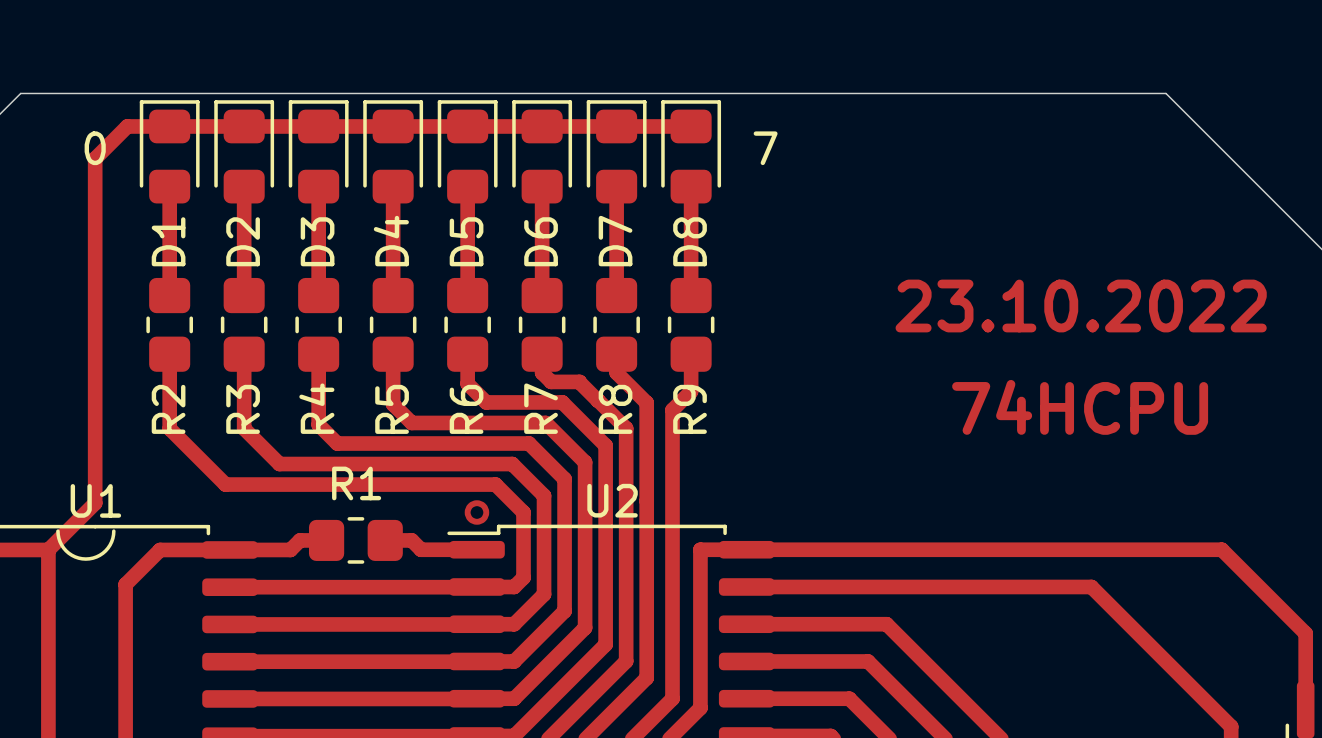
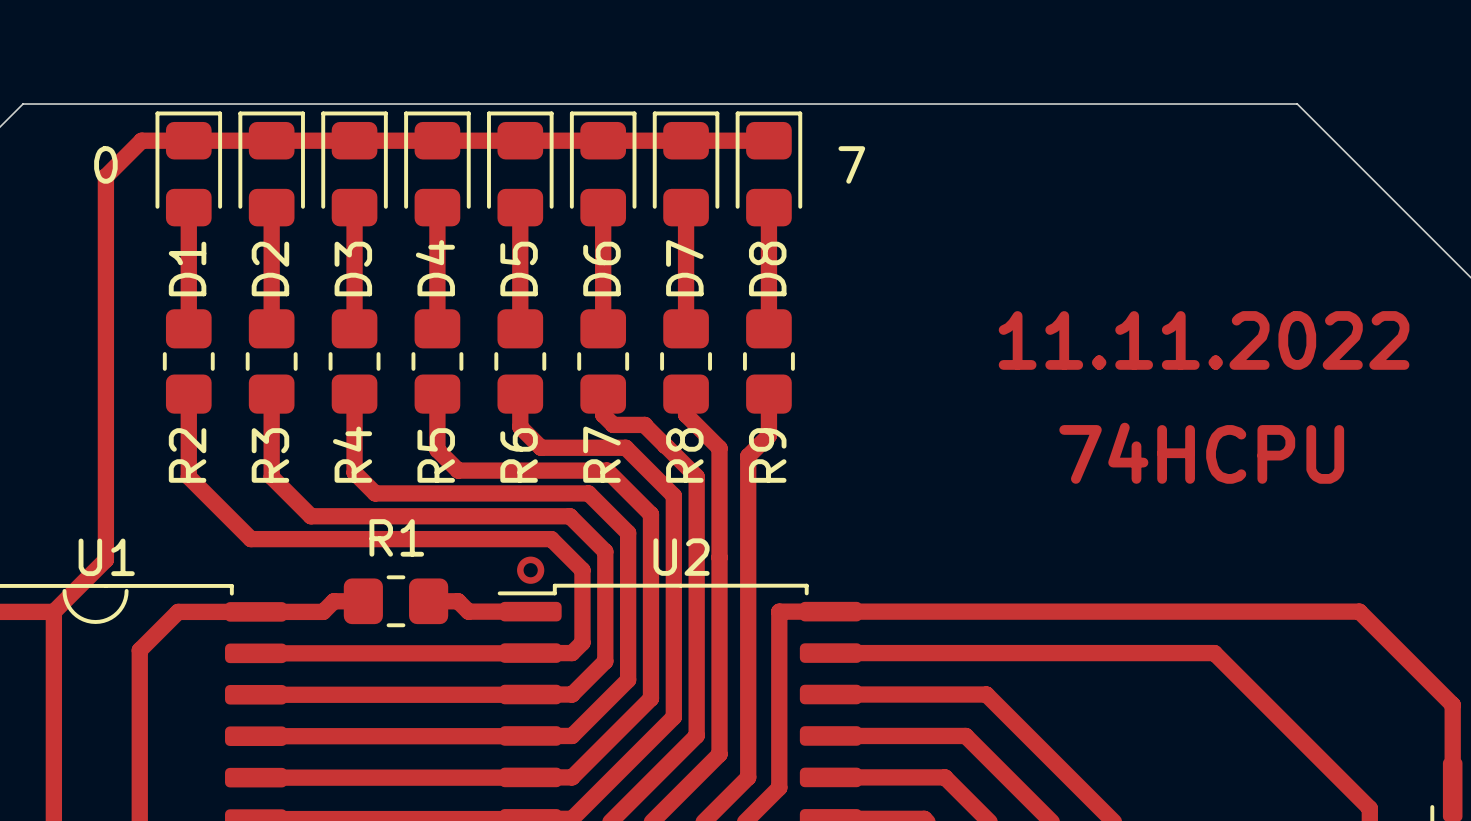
text: 23.10.2022 (1081, 306) -> 11.11.2022 (1204, 340)

